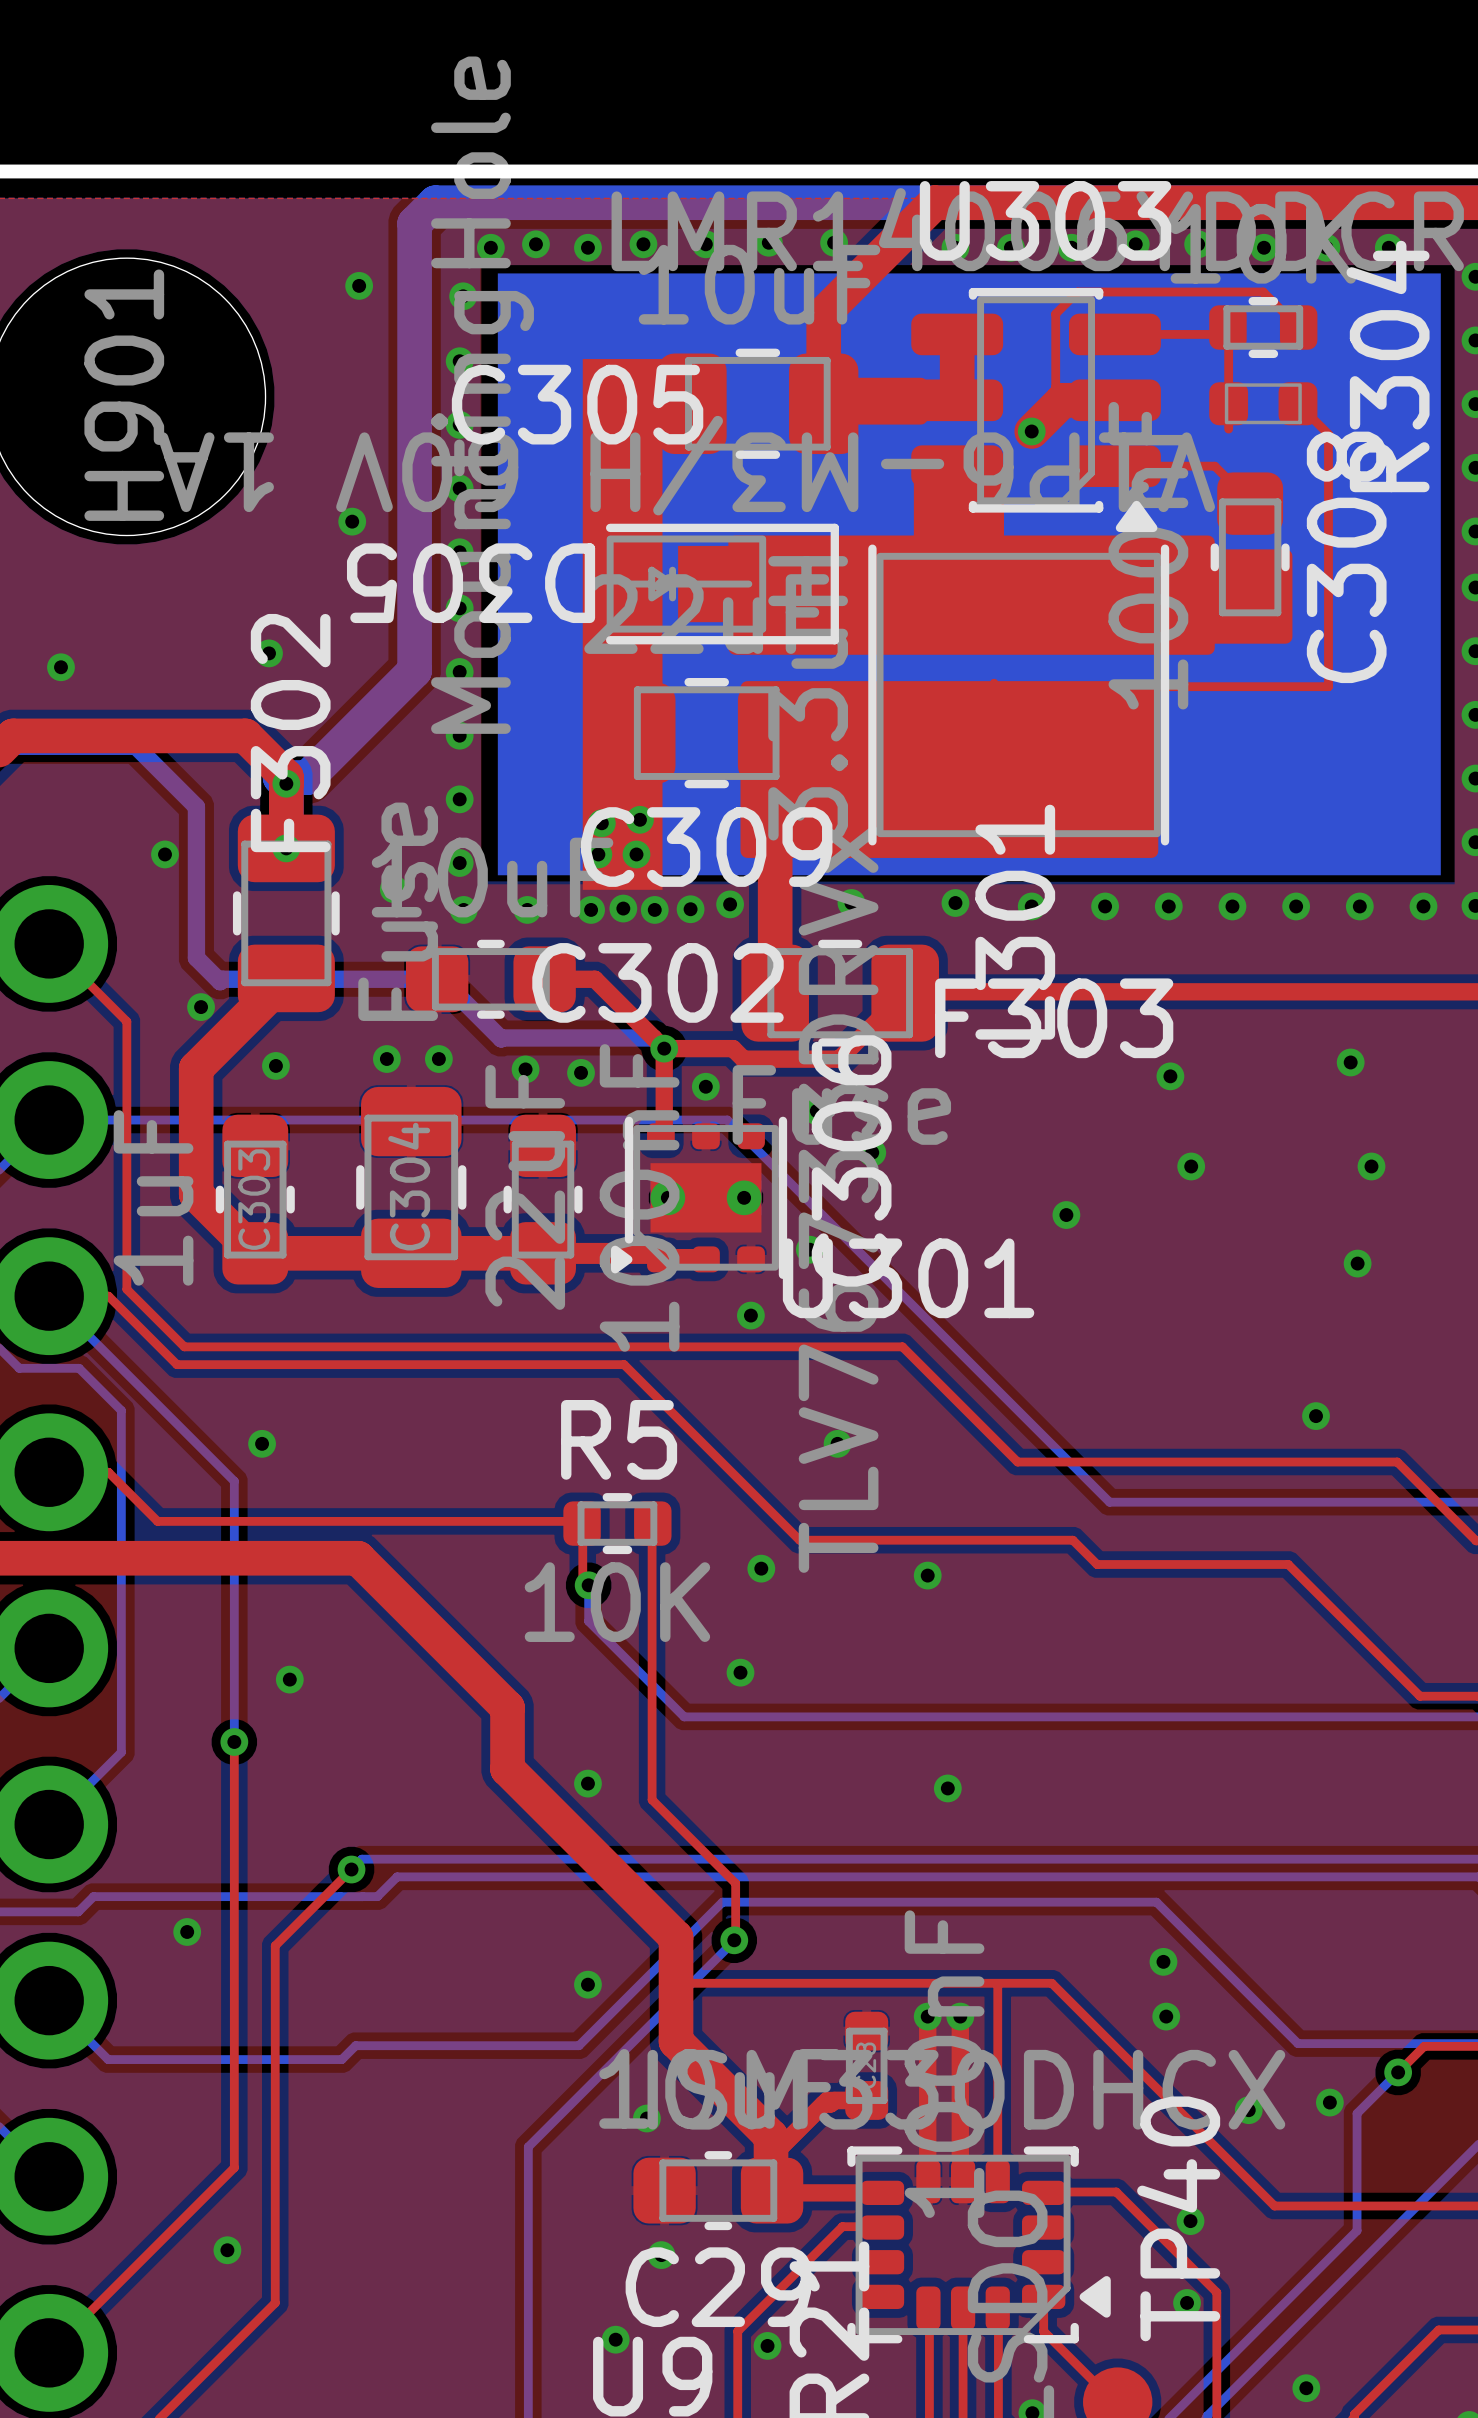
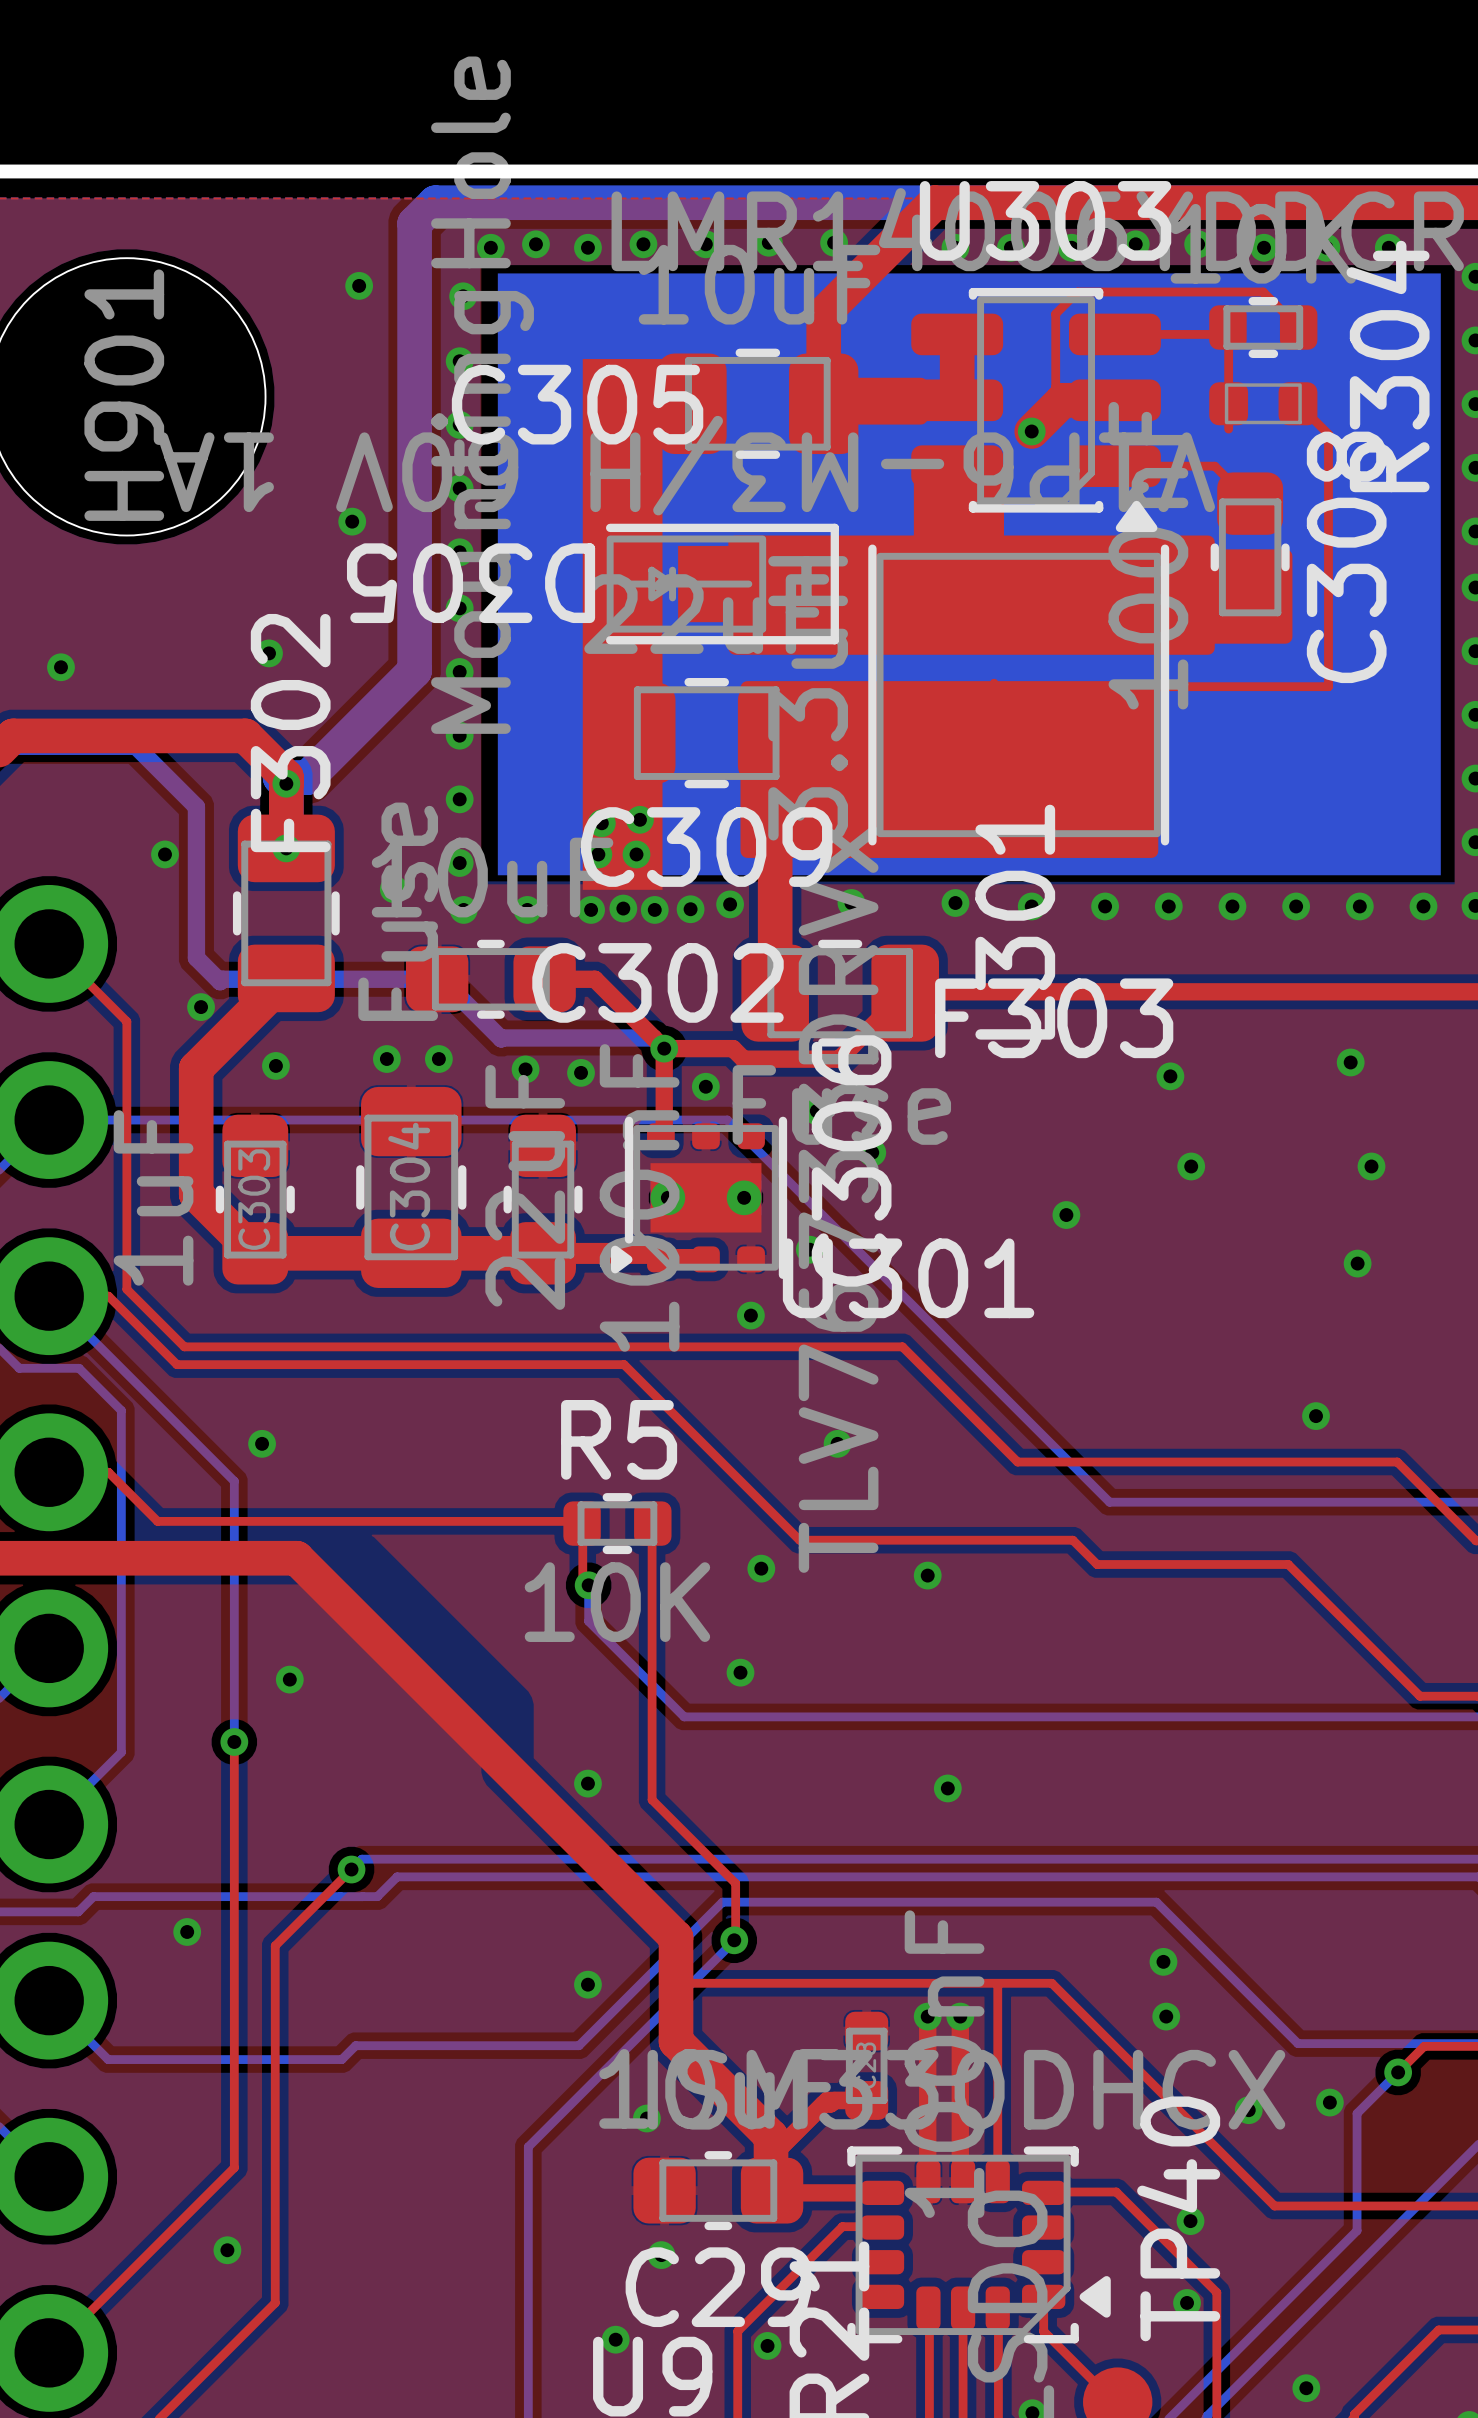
top track: (296, 1558) (358, 1558) (507, 1707) (507, 1769) -> (296, 1558) (507, 1769)

